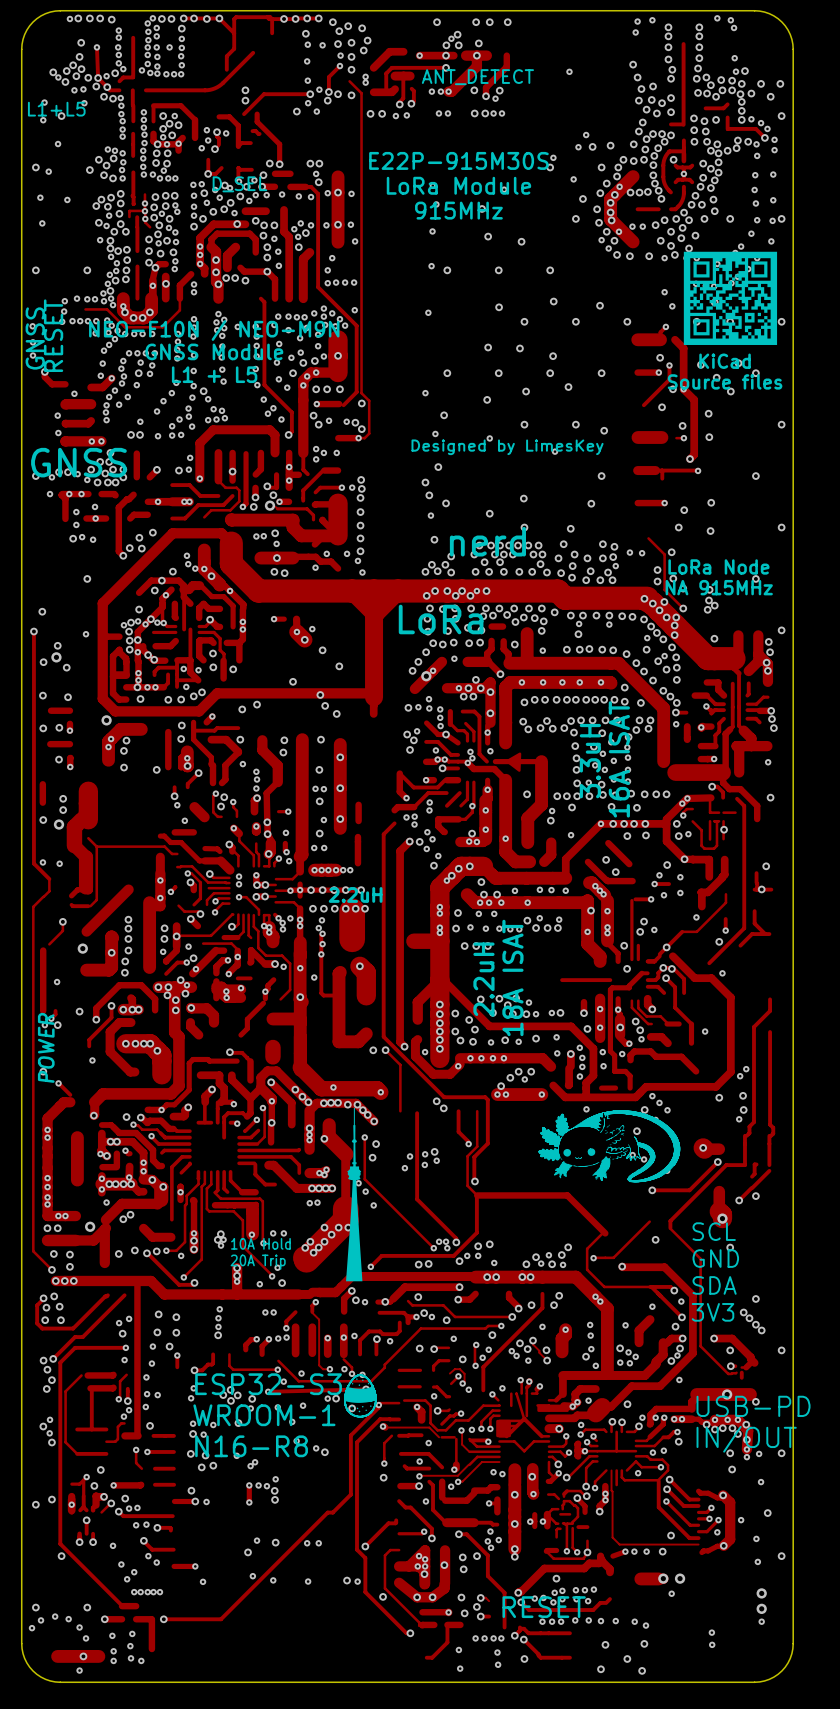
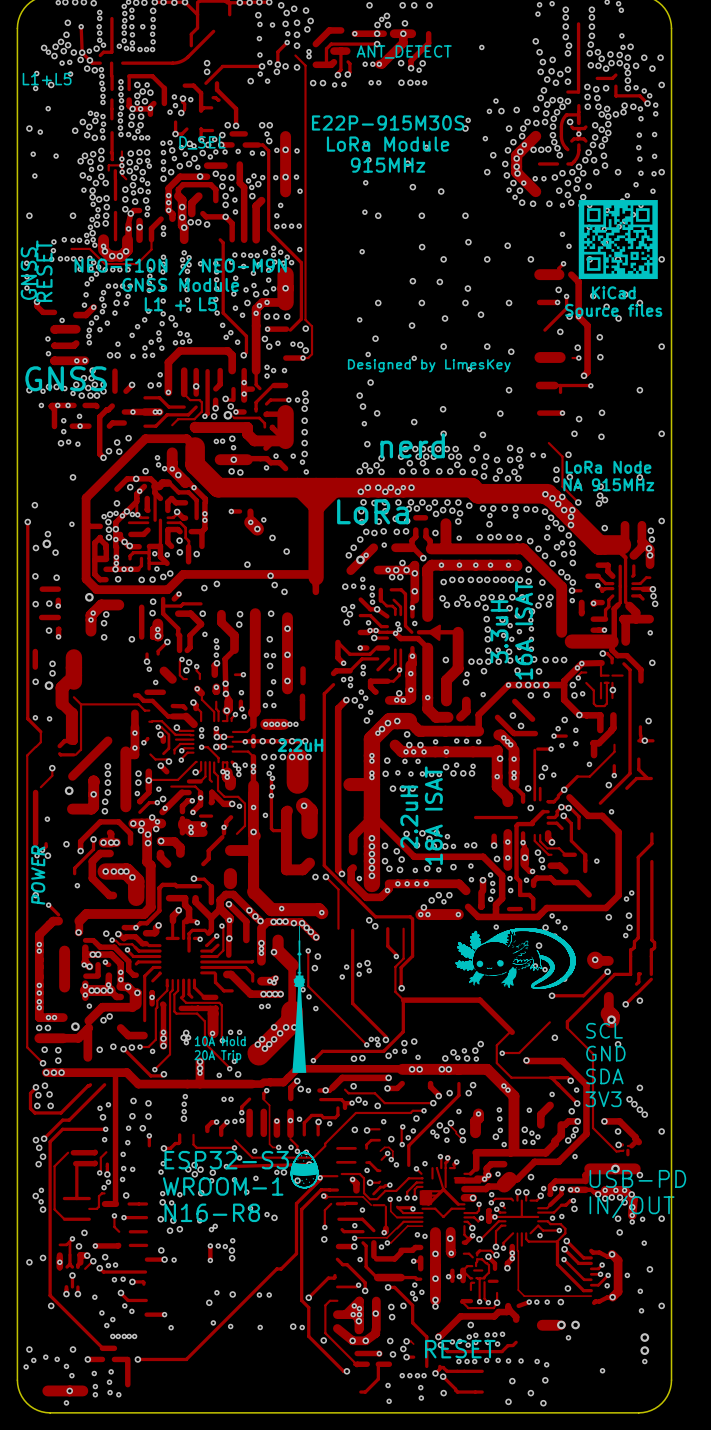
via: (712, 1644) -> none

